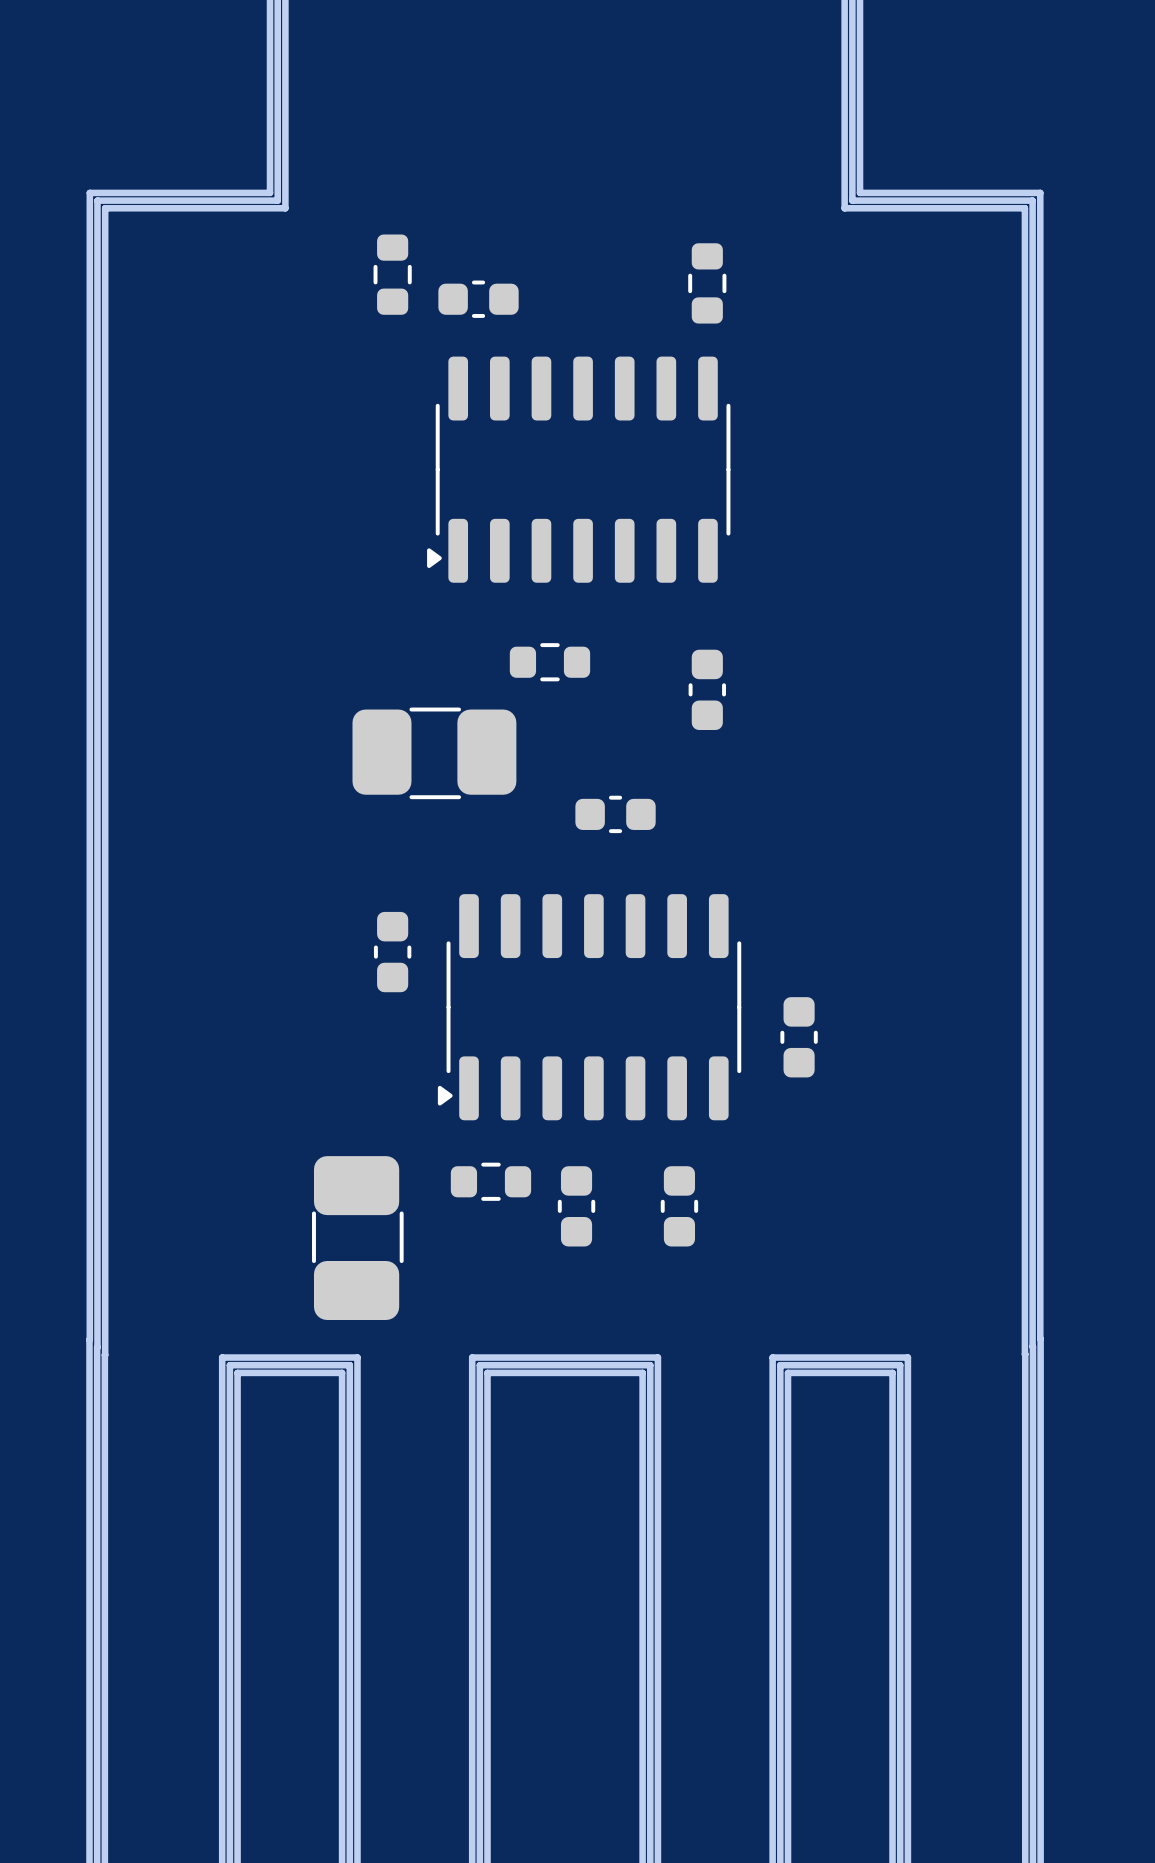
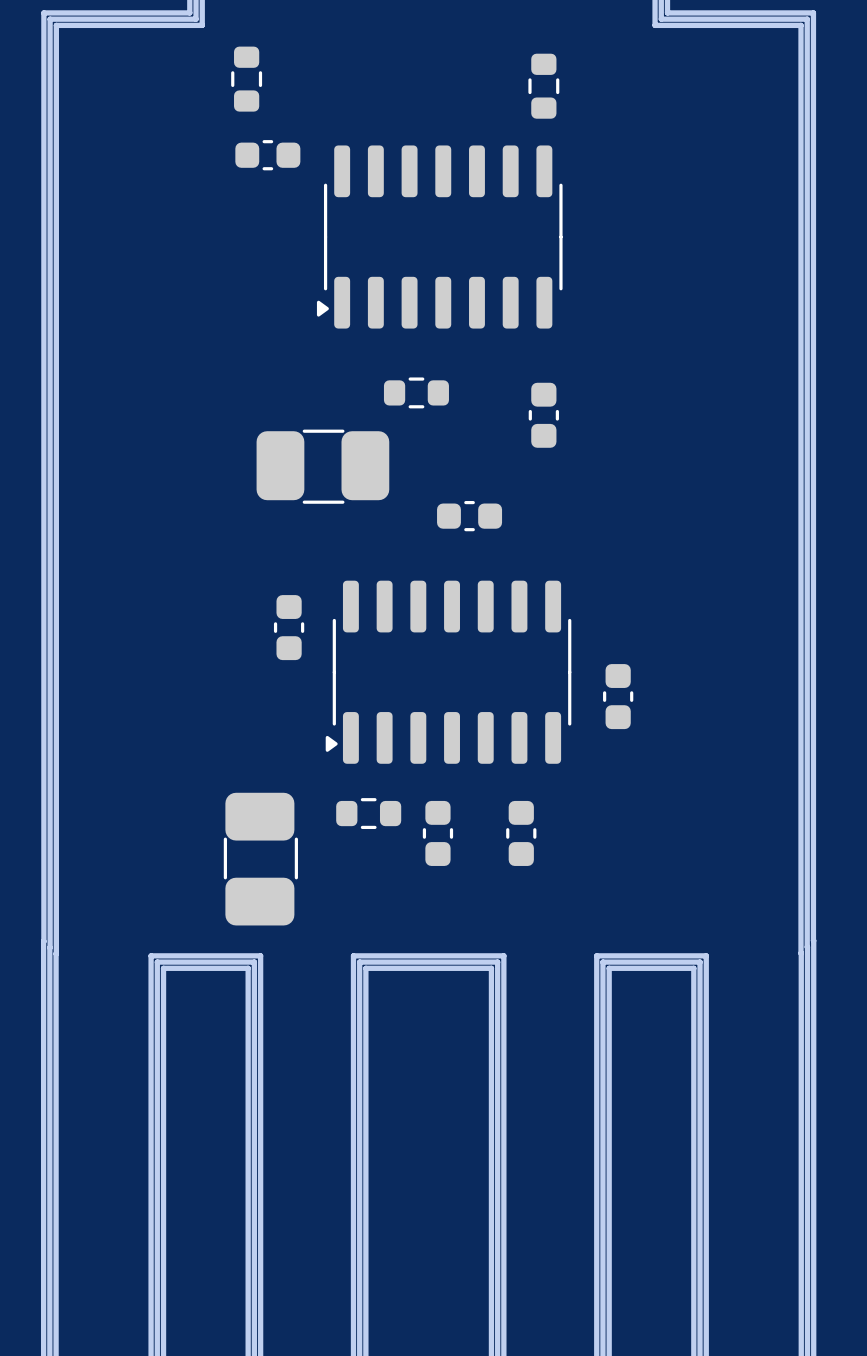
part position: (392, 274) -> (246, 79)
part position: (478, 299) -> (267, 155)

